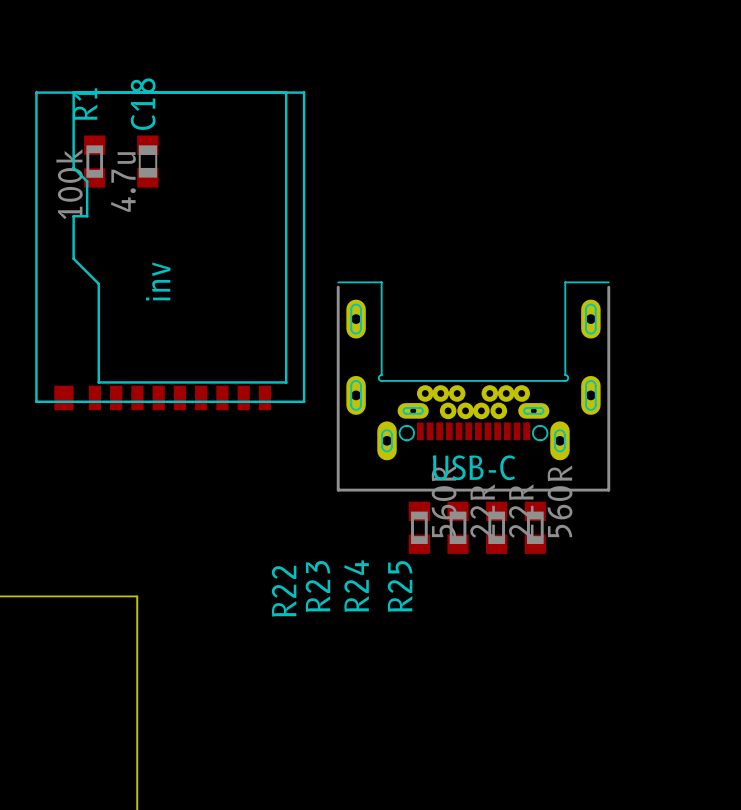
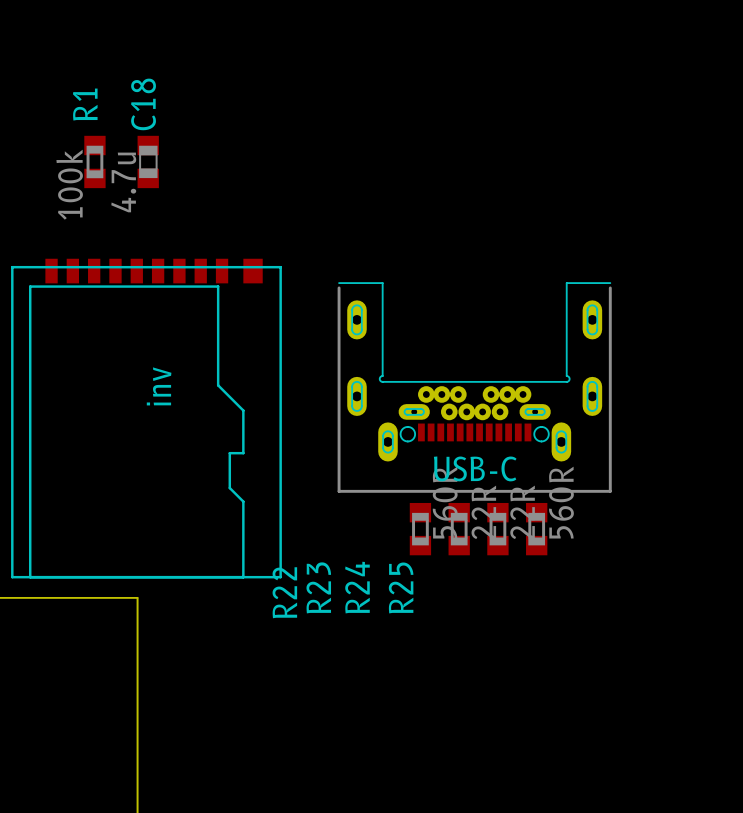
part: (170, 250) -> none
part: none -> (146, 418)

